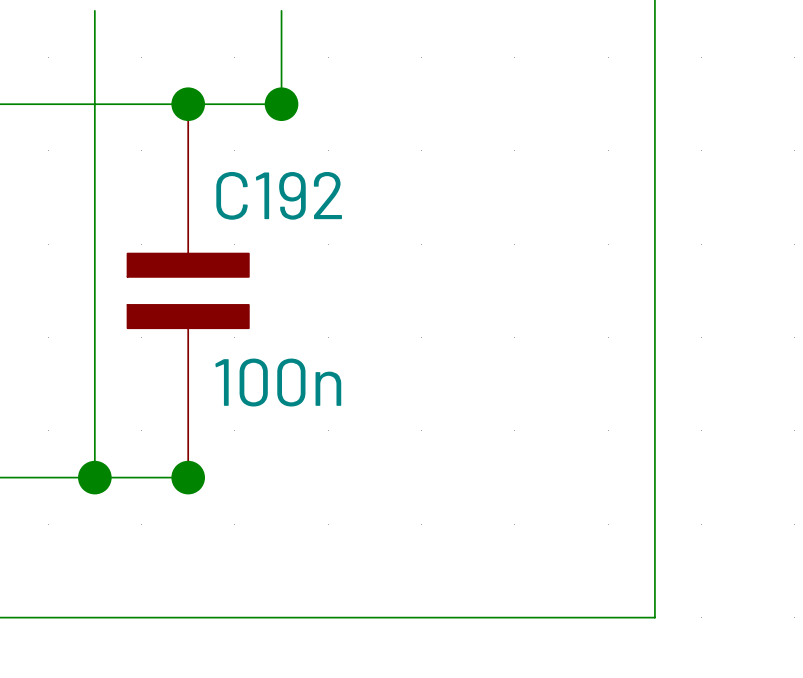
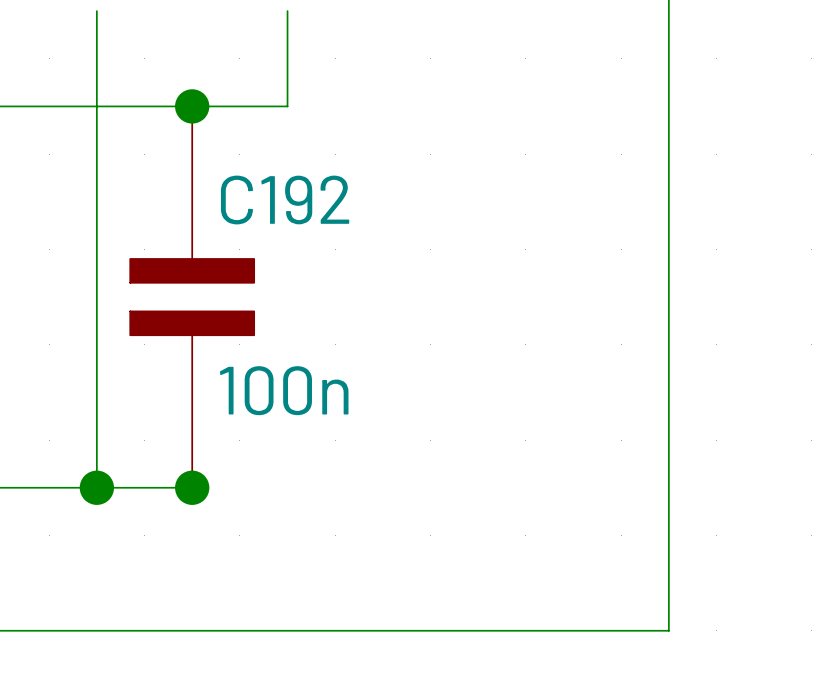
junction: (281, 104) -> none

